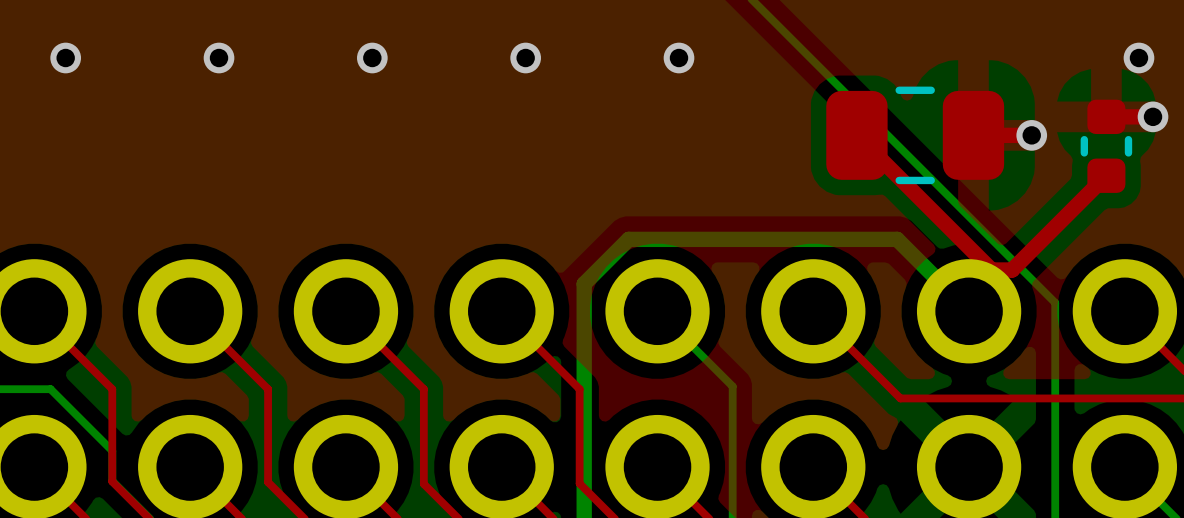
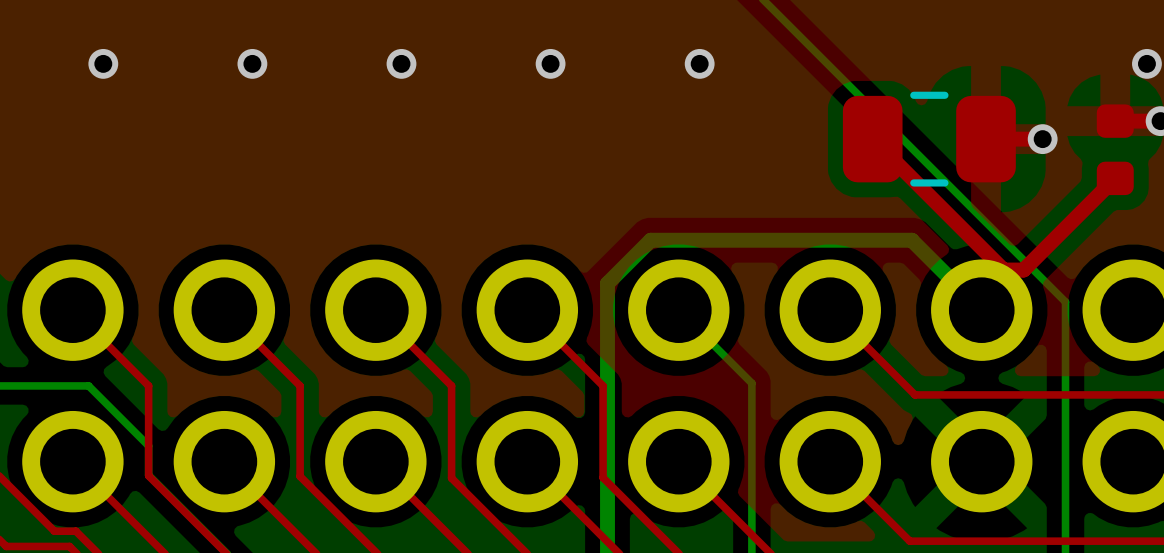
part footprint: [1080, 99, 1133, 193] -> [1096, 104, 1134, 196]

